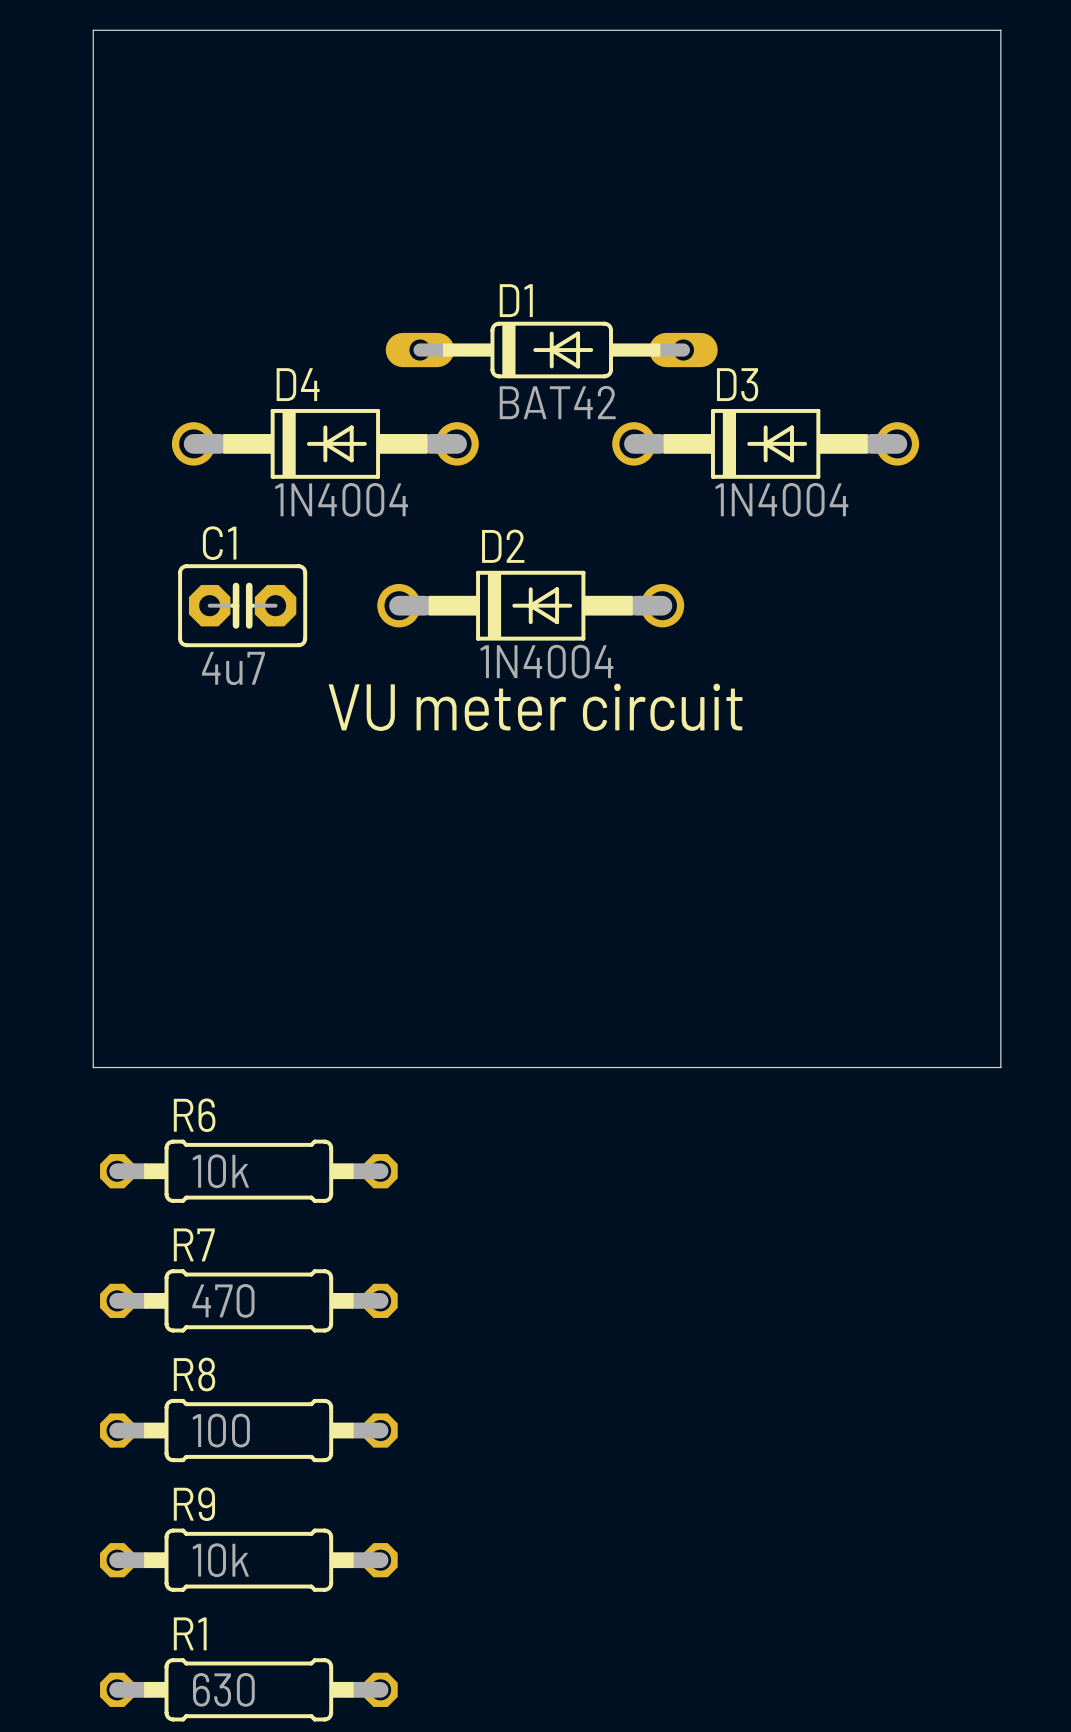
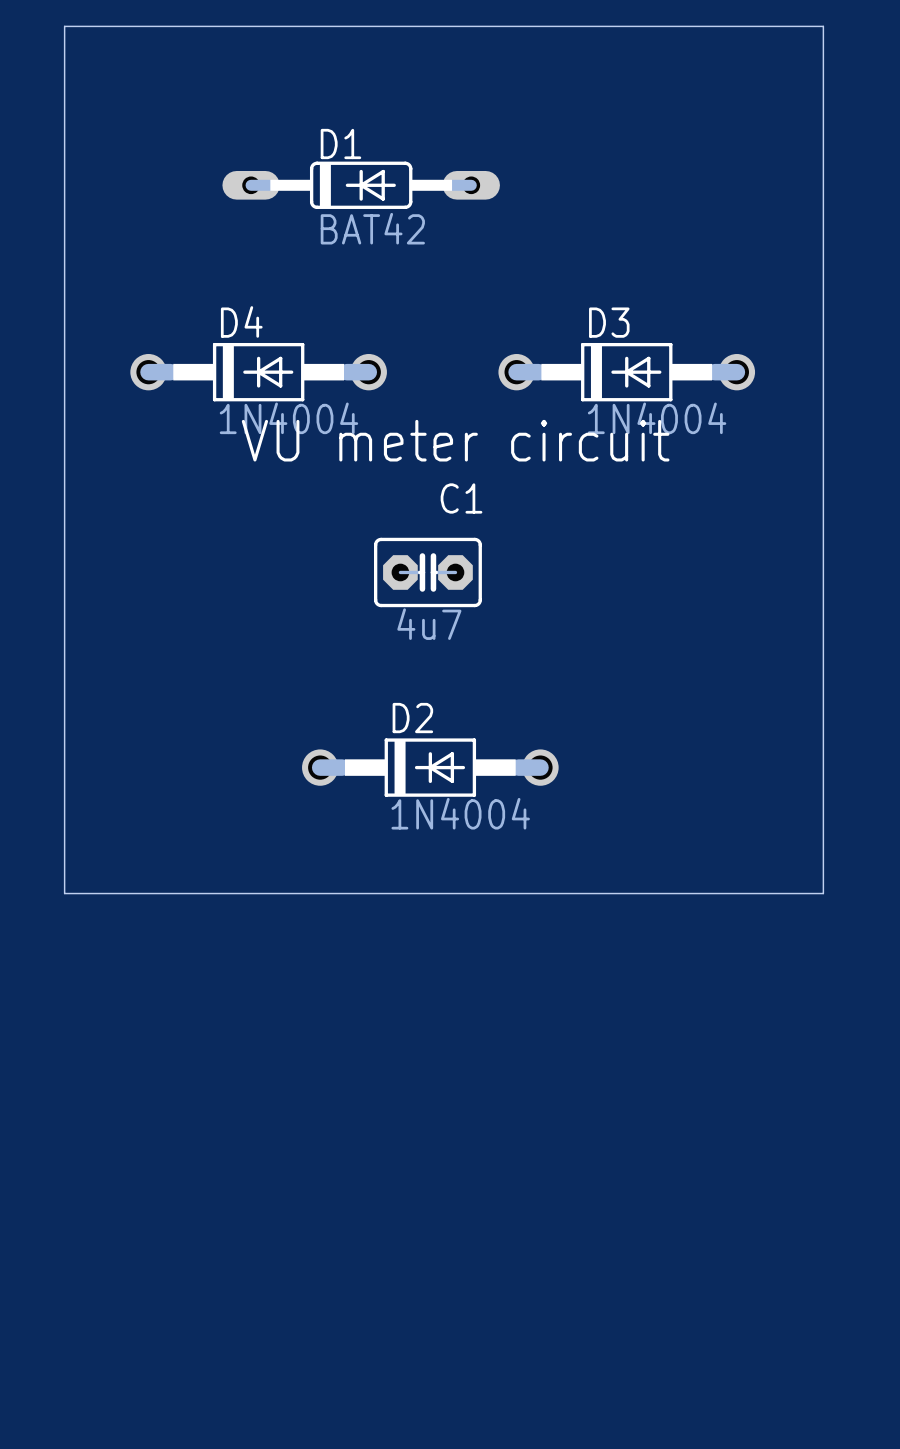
D1 position: (551, 350) -> (361, 185)
C1 name position: C1 (219, 543) -> C1 (461, 498)
C1 position: (242, 605) -> (427, 572)
D2 position: (530, 605) -> (430, 767)
text position: VU meter circuit (535, 707) -> VU meter circuit (455, 440)
R6: 10k (248, 1171) -> none
R7: 470 (248, 1300) -> none
R8: 100 (248, 1430) -> none
R9: 10k (248, 1560) -> none
R1: 630 (248, 1689) -> none

